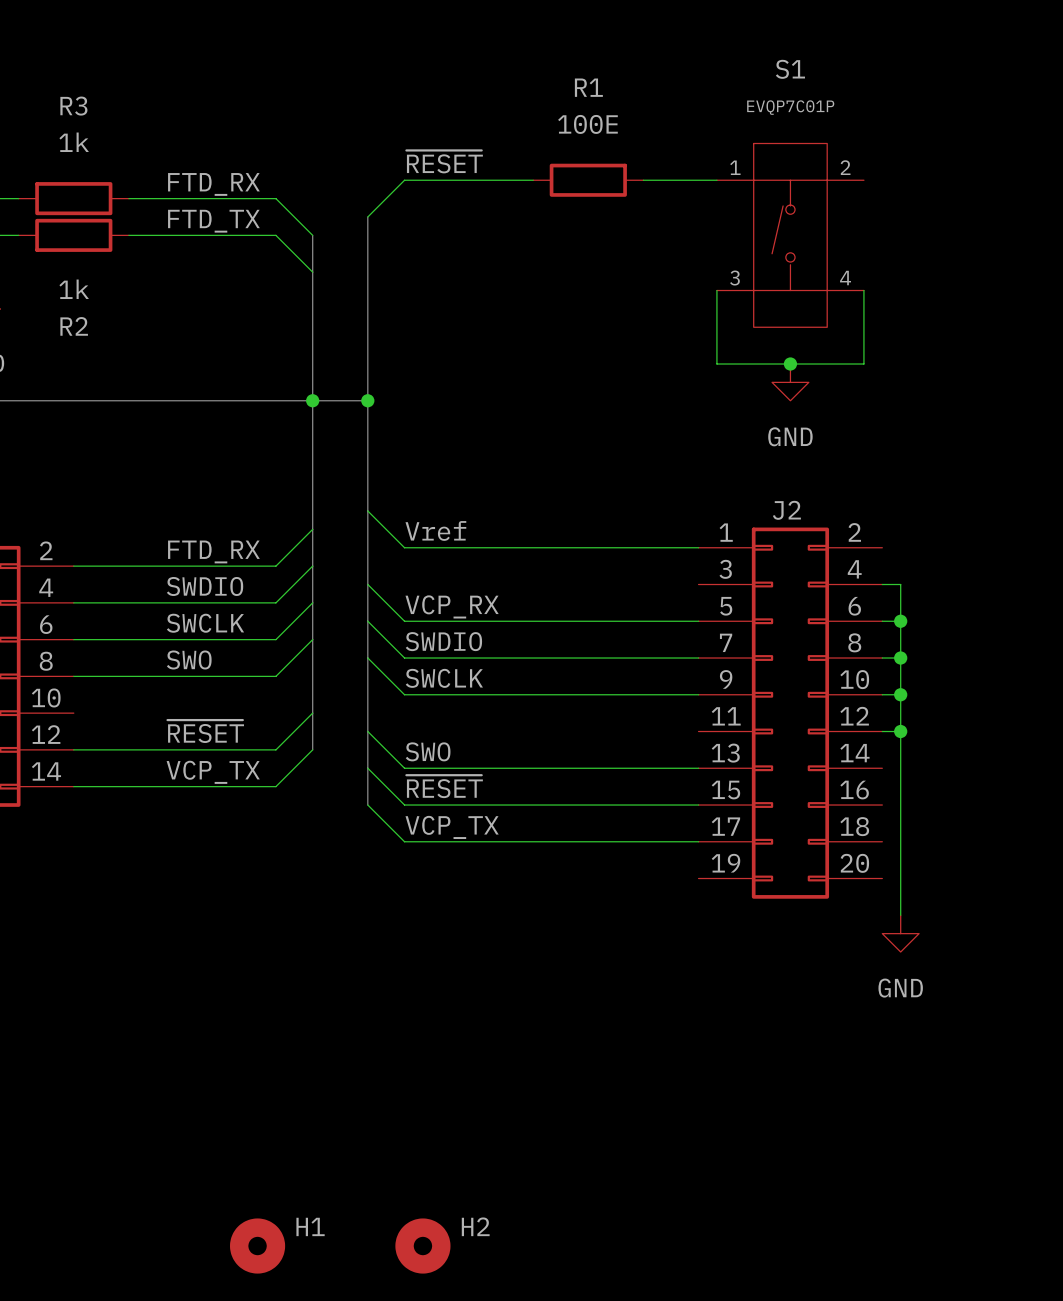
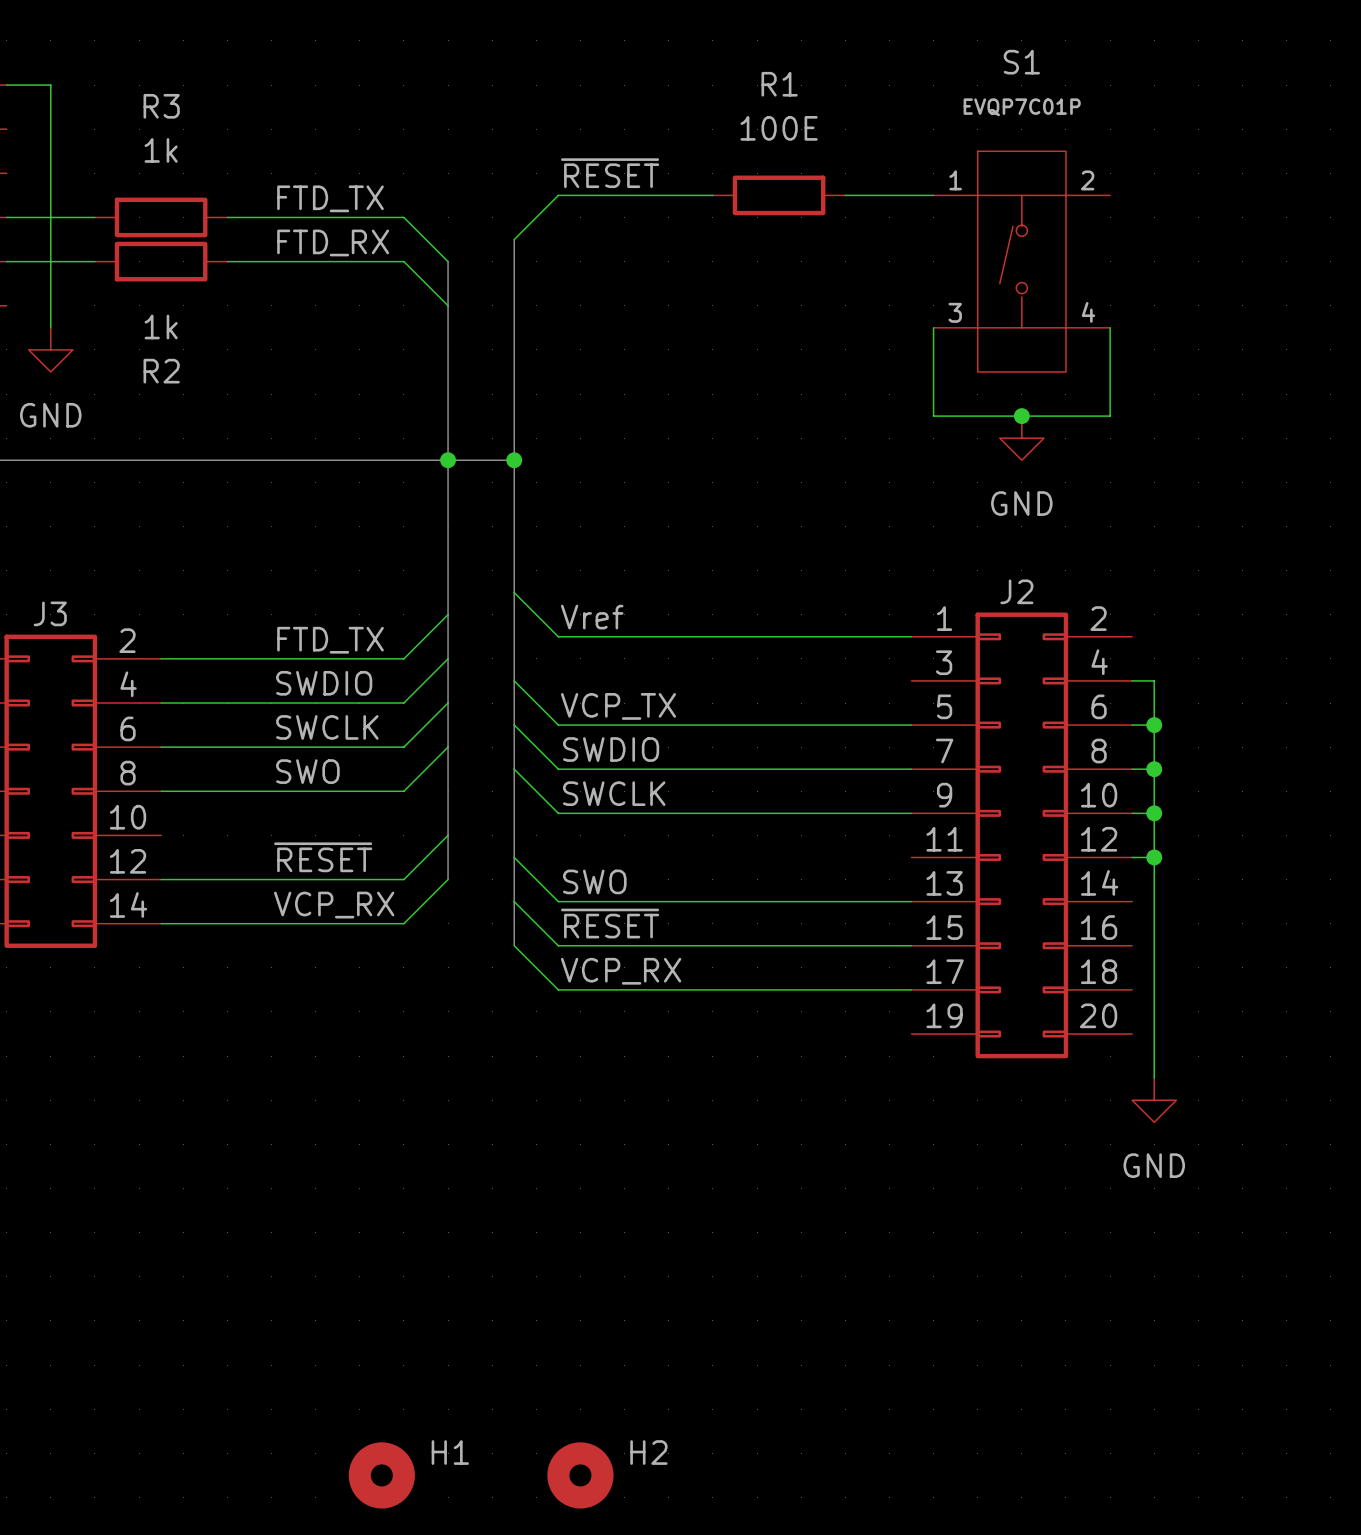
label: FTD_RX (213, 184) -> FTD_TX (330, 198)
label: FTD_TX (213, 221) -> FTD_RX (333, 242)
label: FTD_RX (213, 551) -> FTD_TX (330, 640)
label: VCP_RX (452, 606) -> VCP_TX (618, 706)
label: VCP_TX (213, 772) -> VCP_RX (334, 905)
label: VCP_TX (452, 827) -> VCP_RX (621, 971)

